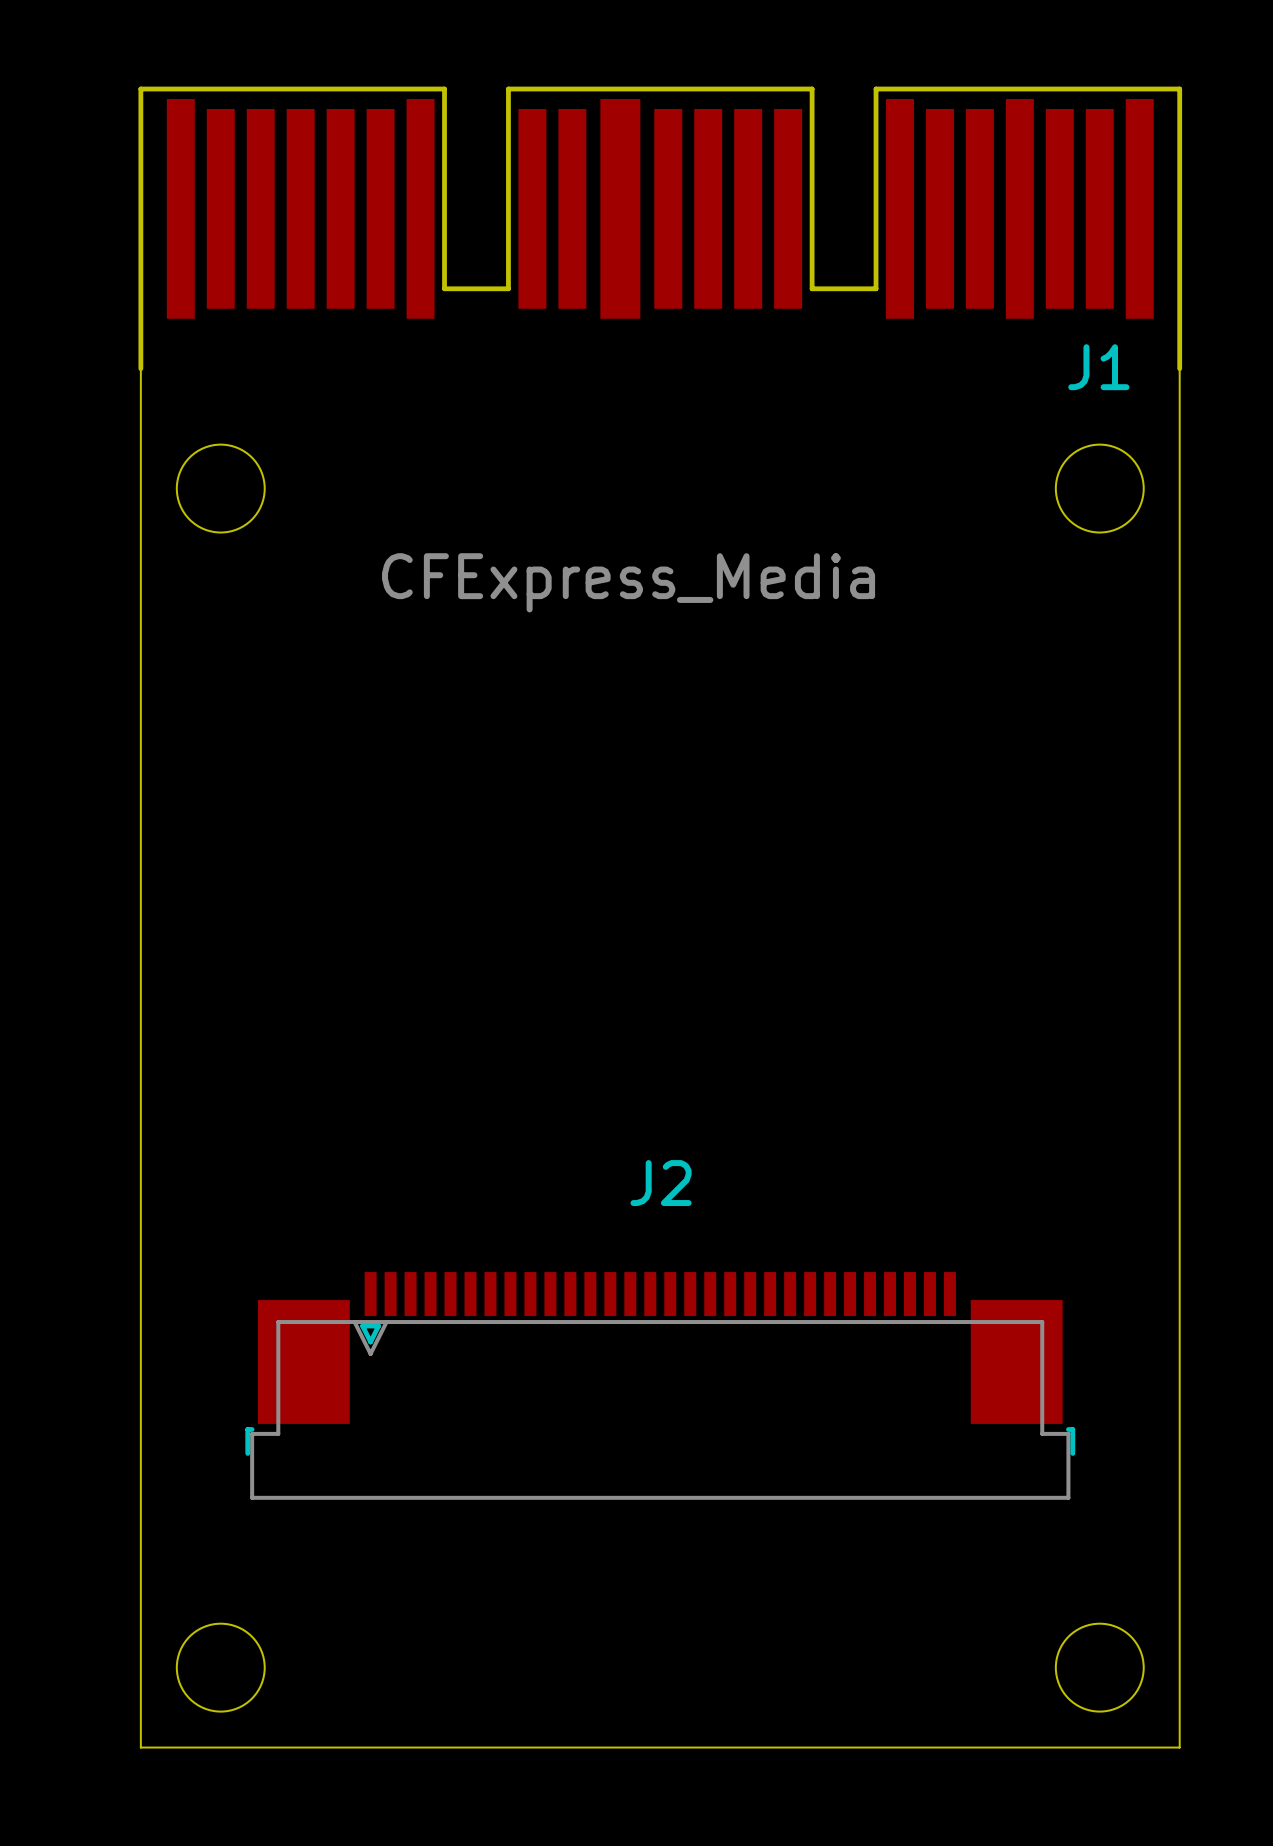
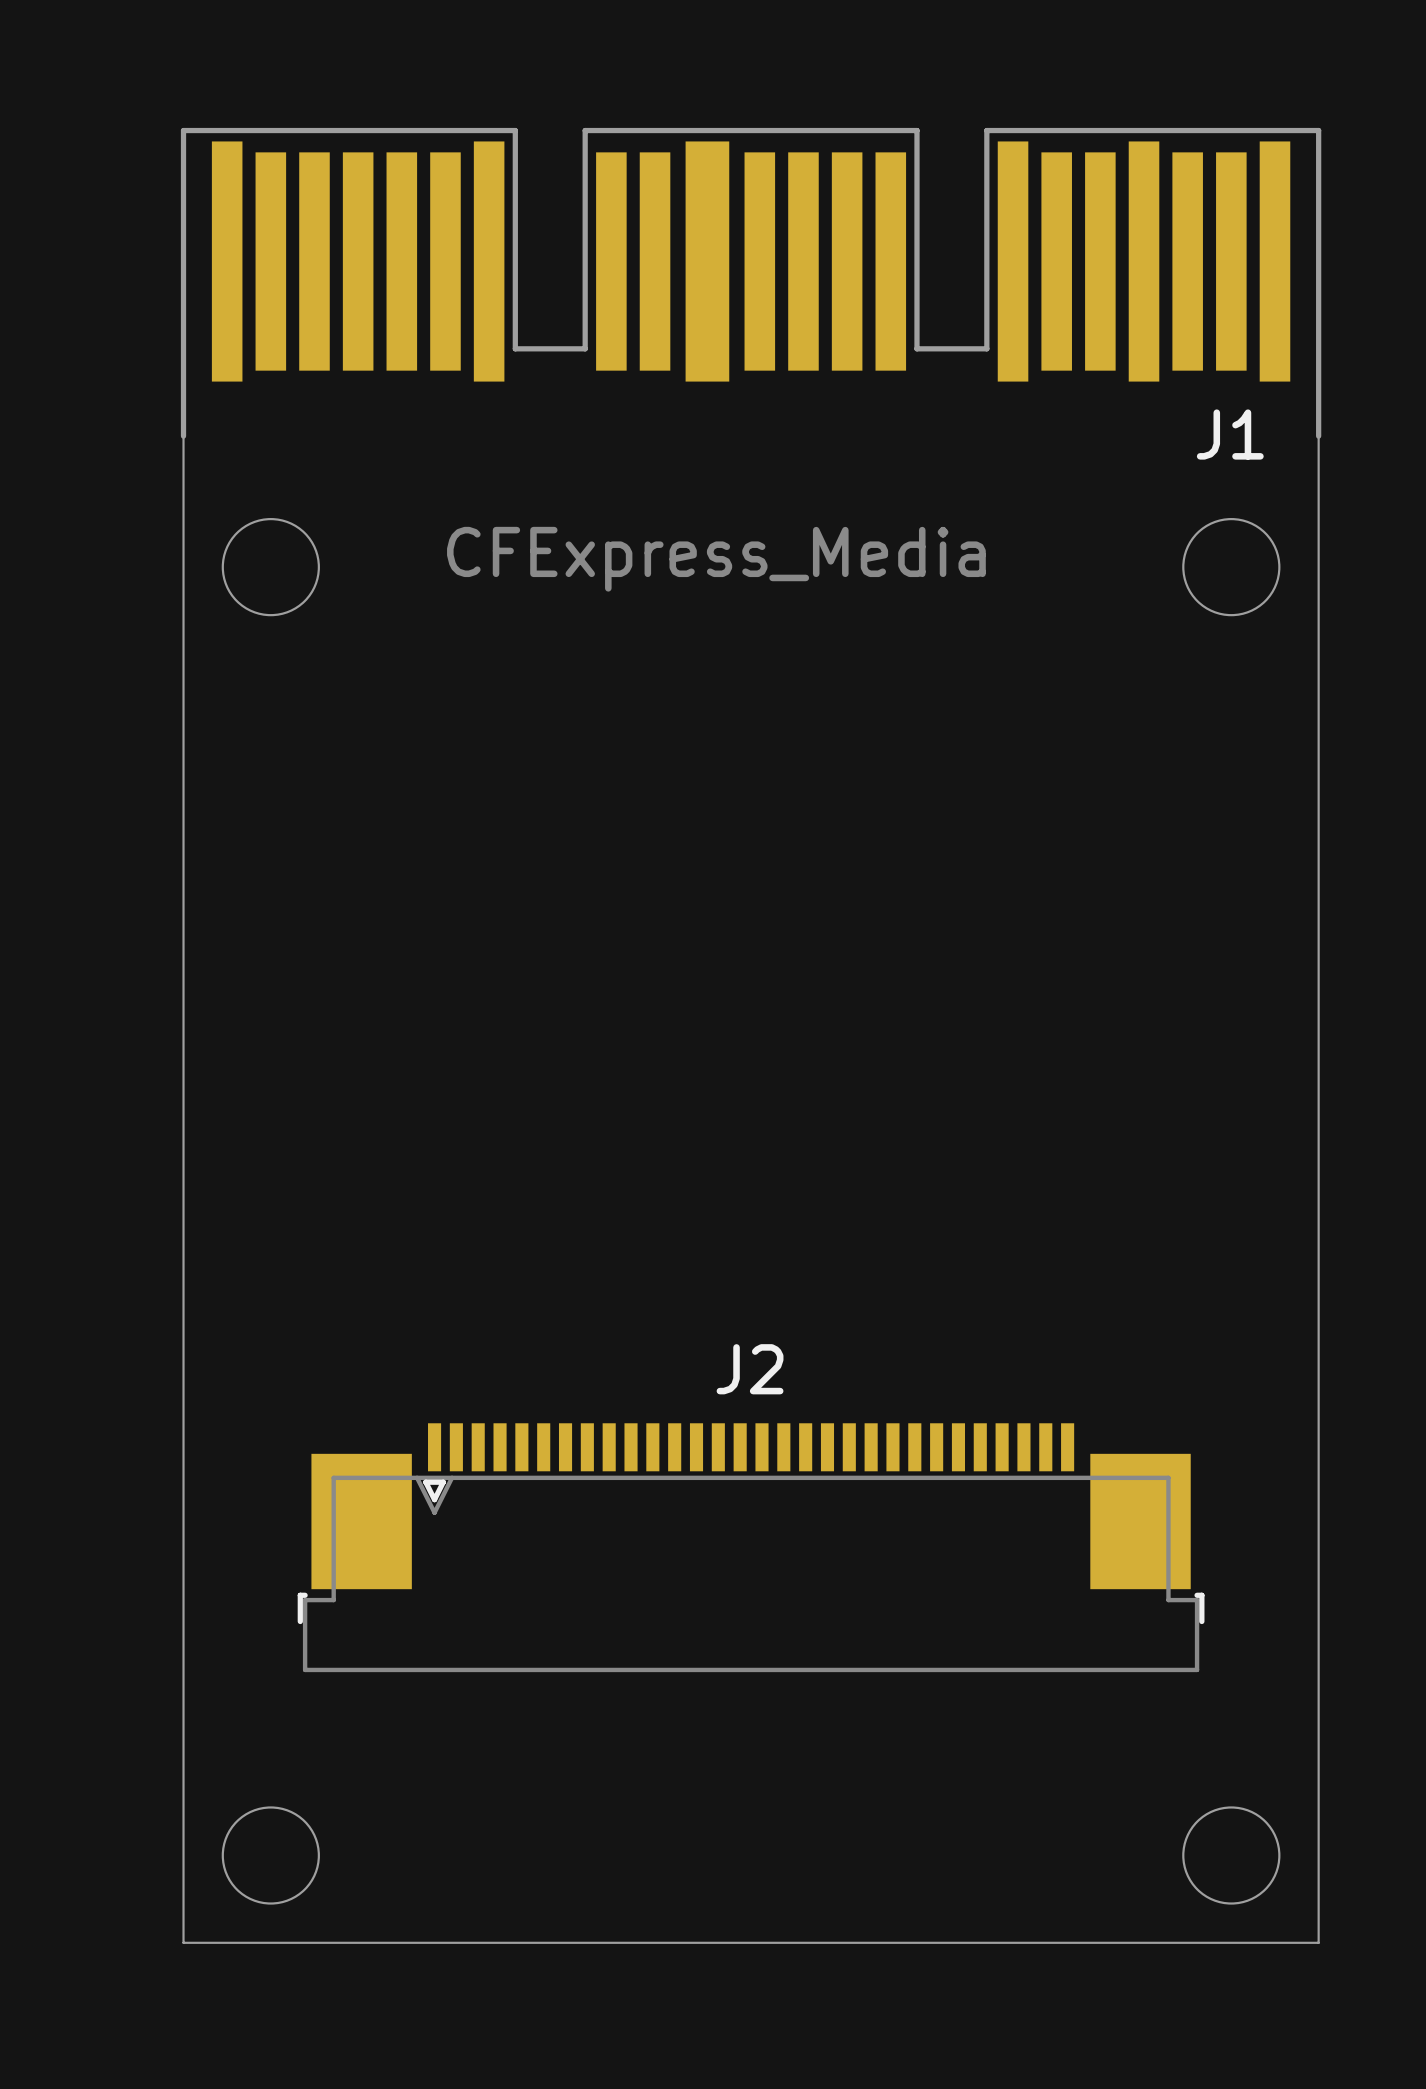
J1 value position: CFExpress_Media (628, 582) -> CFExpress_Media (716, 559)
J2 name position: J2 (661, 1183) -> J2 (750, 1369)

